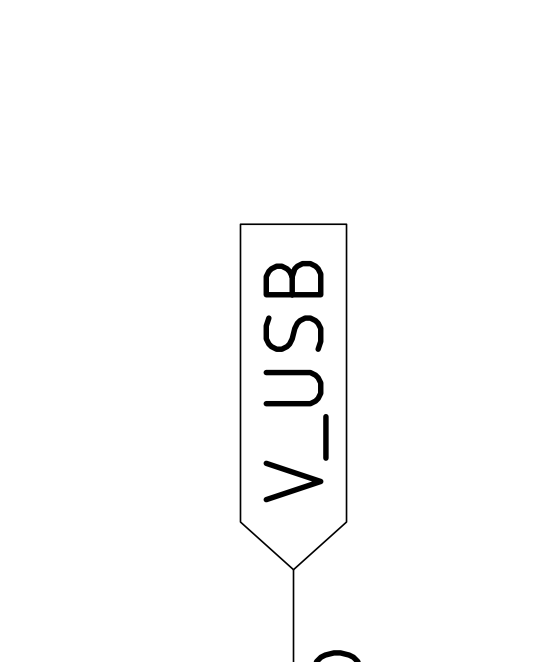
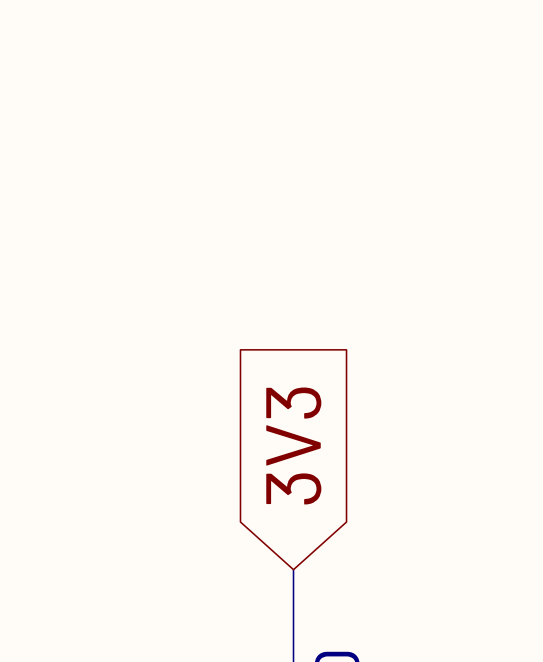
global label: V_USB (296, 381) -> 3V3 (293, 446)

